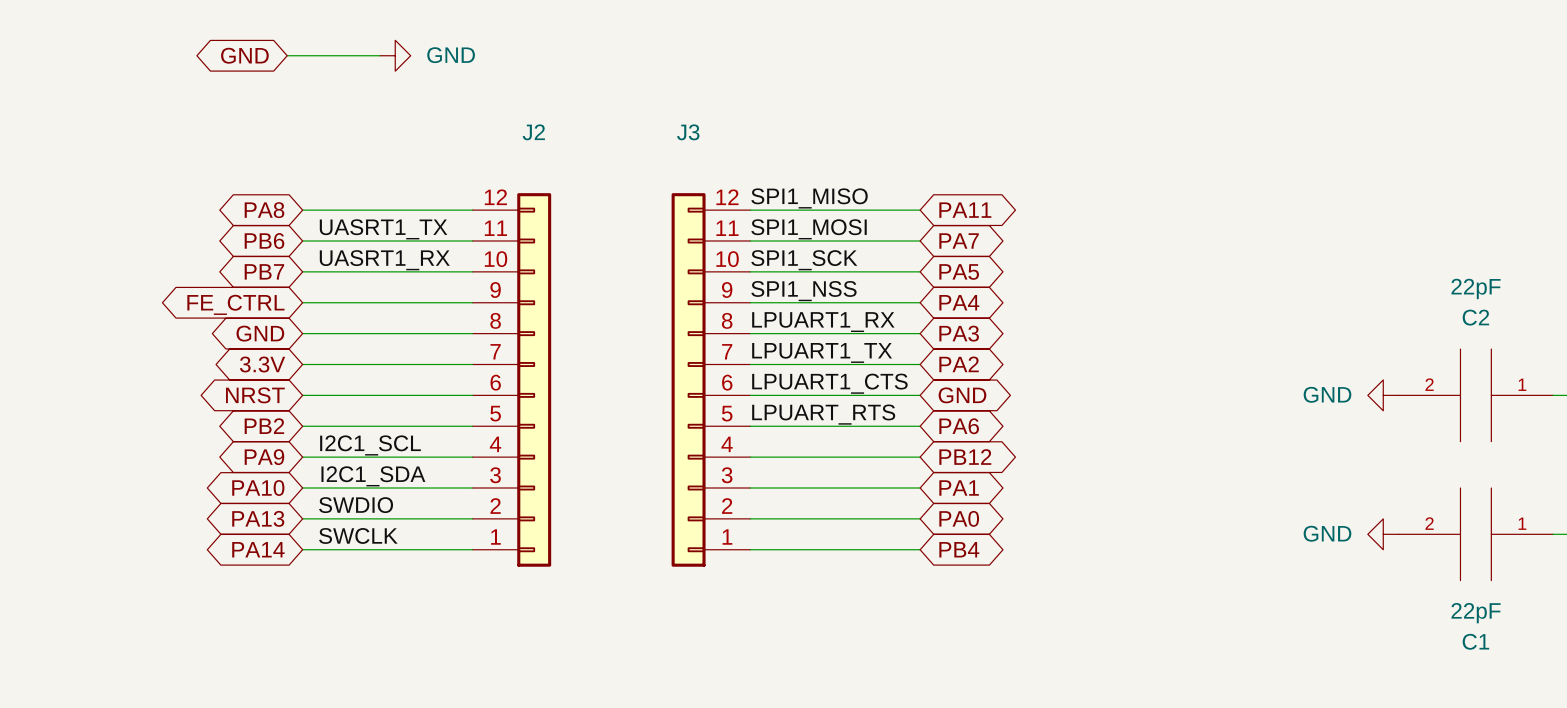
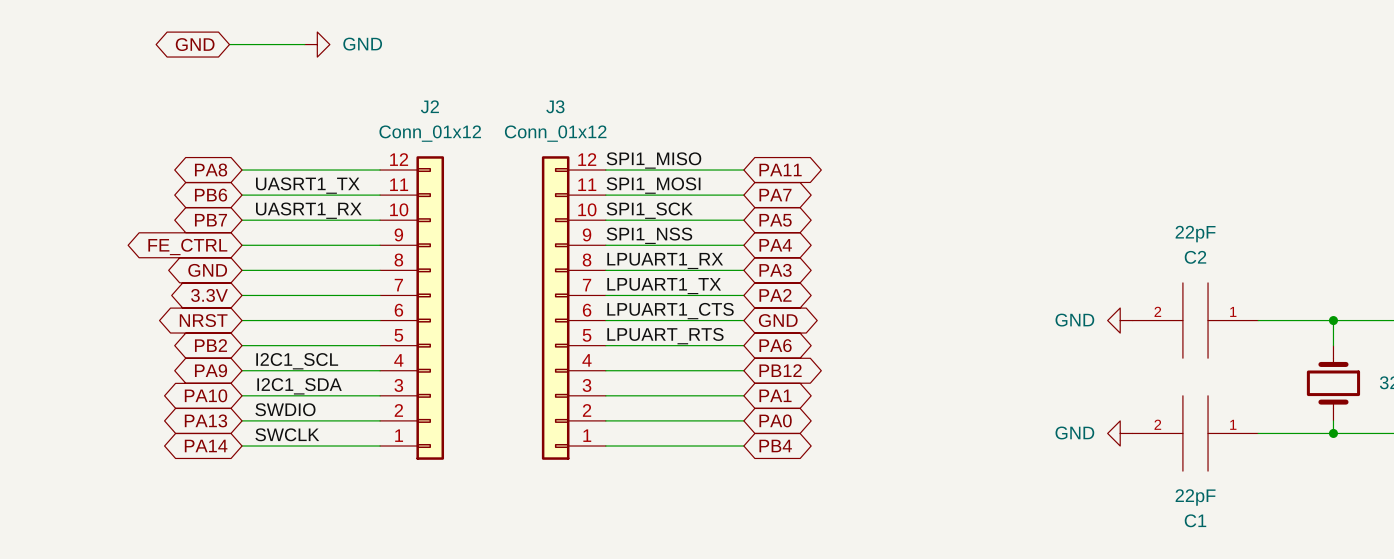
J2 value: none -> Conn_01x12 (430, 133)
J3 value: none -> Conn_01x12 (555, 133)

